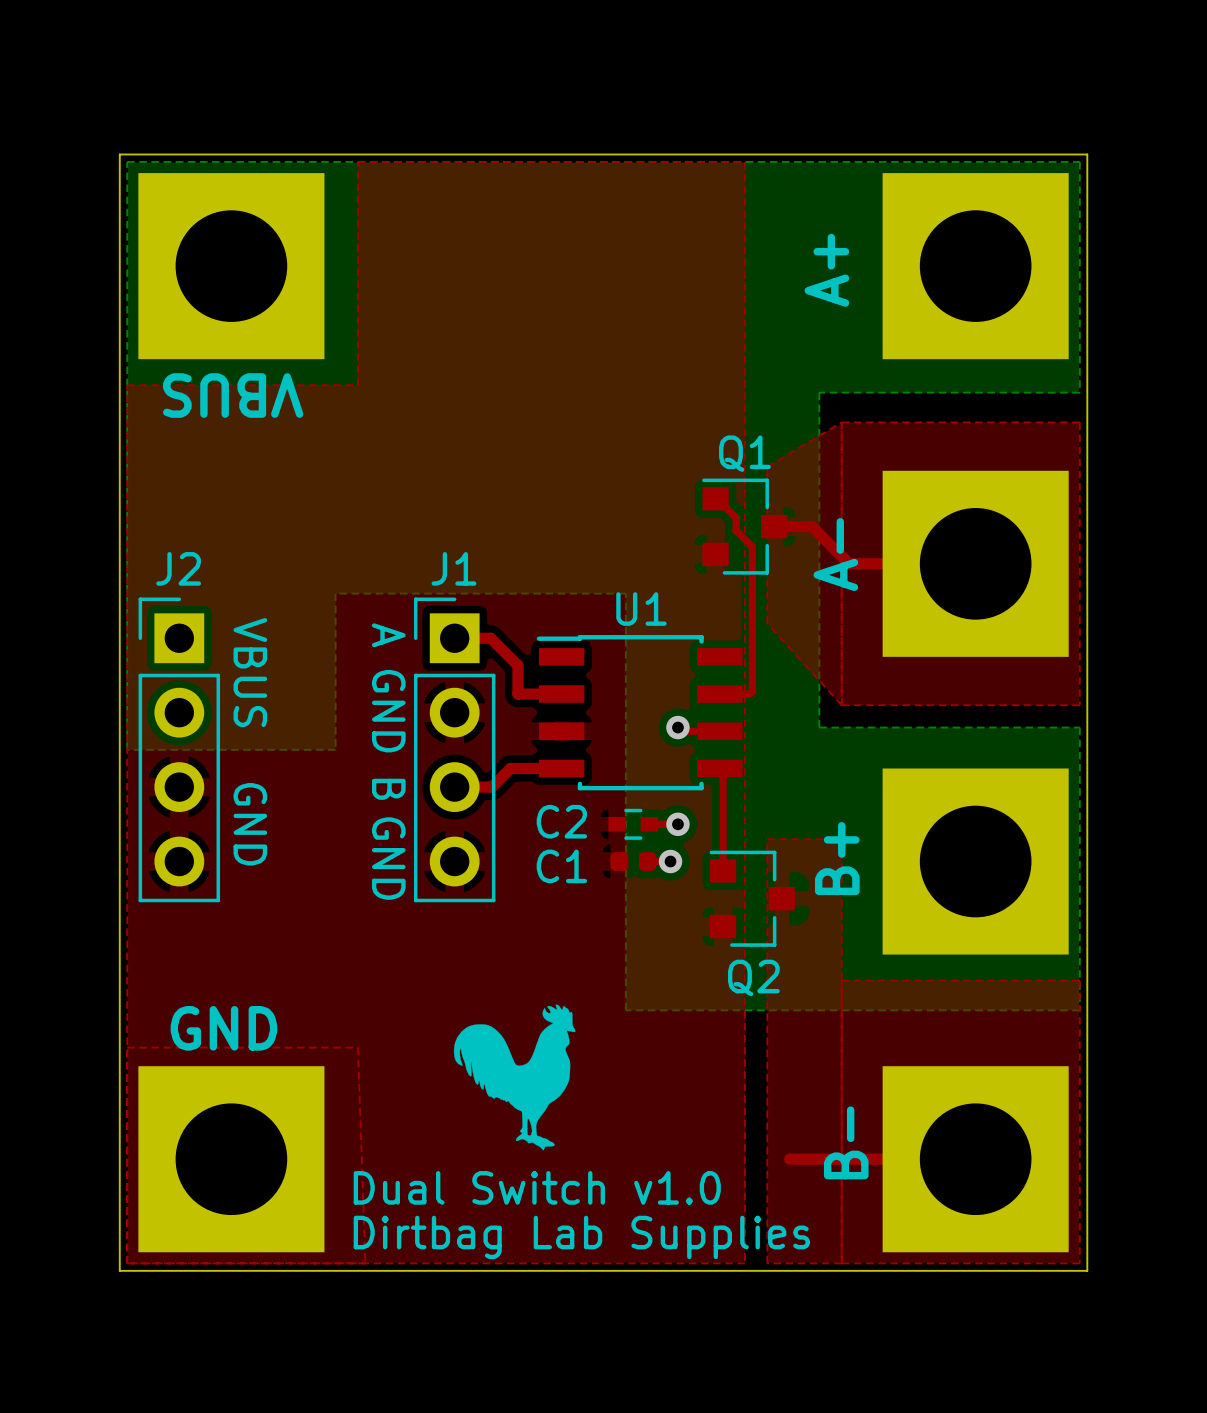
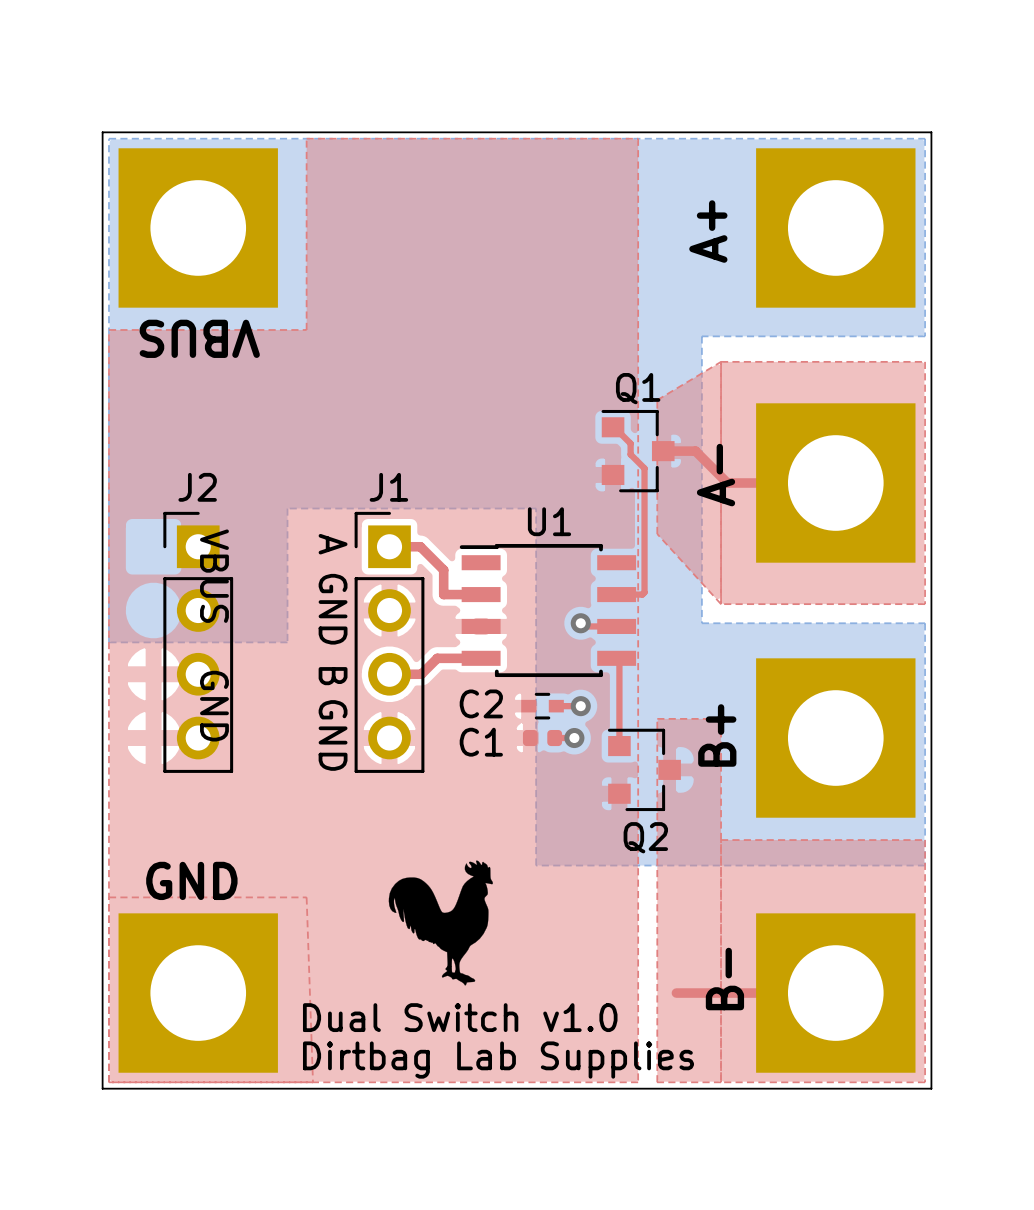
J2 position: (179, 749) -> (198, 642)

